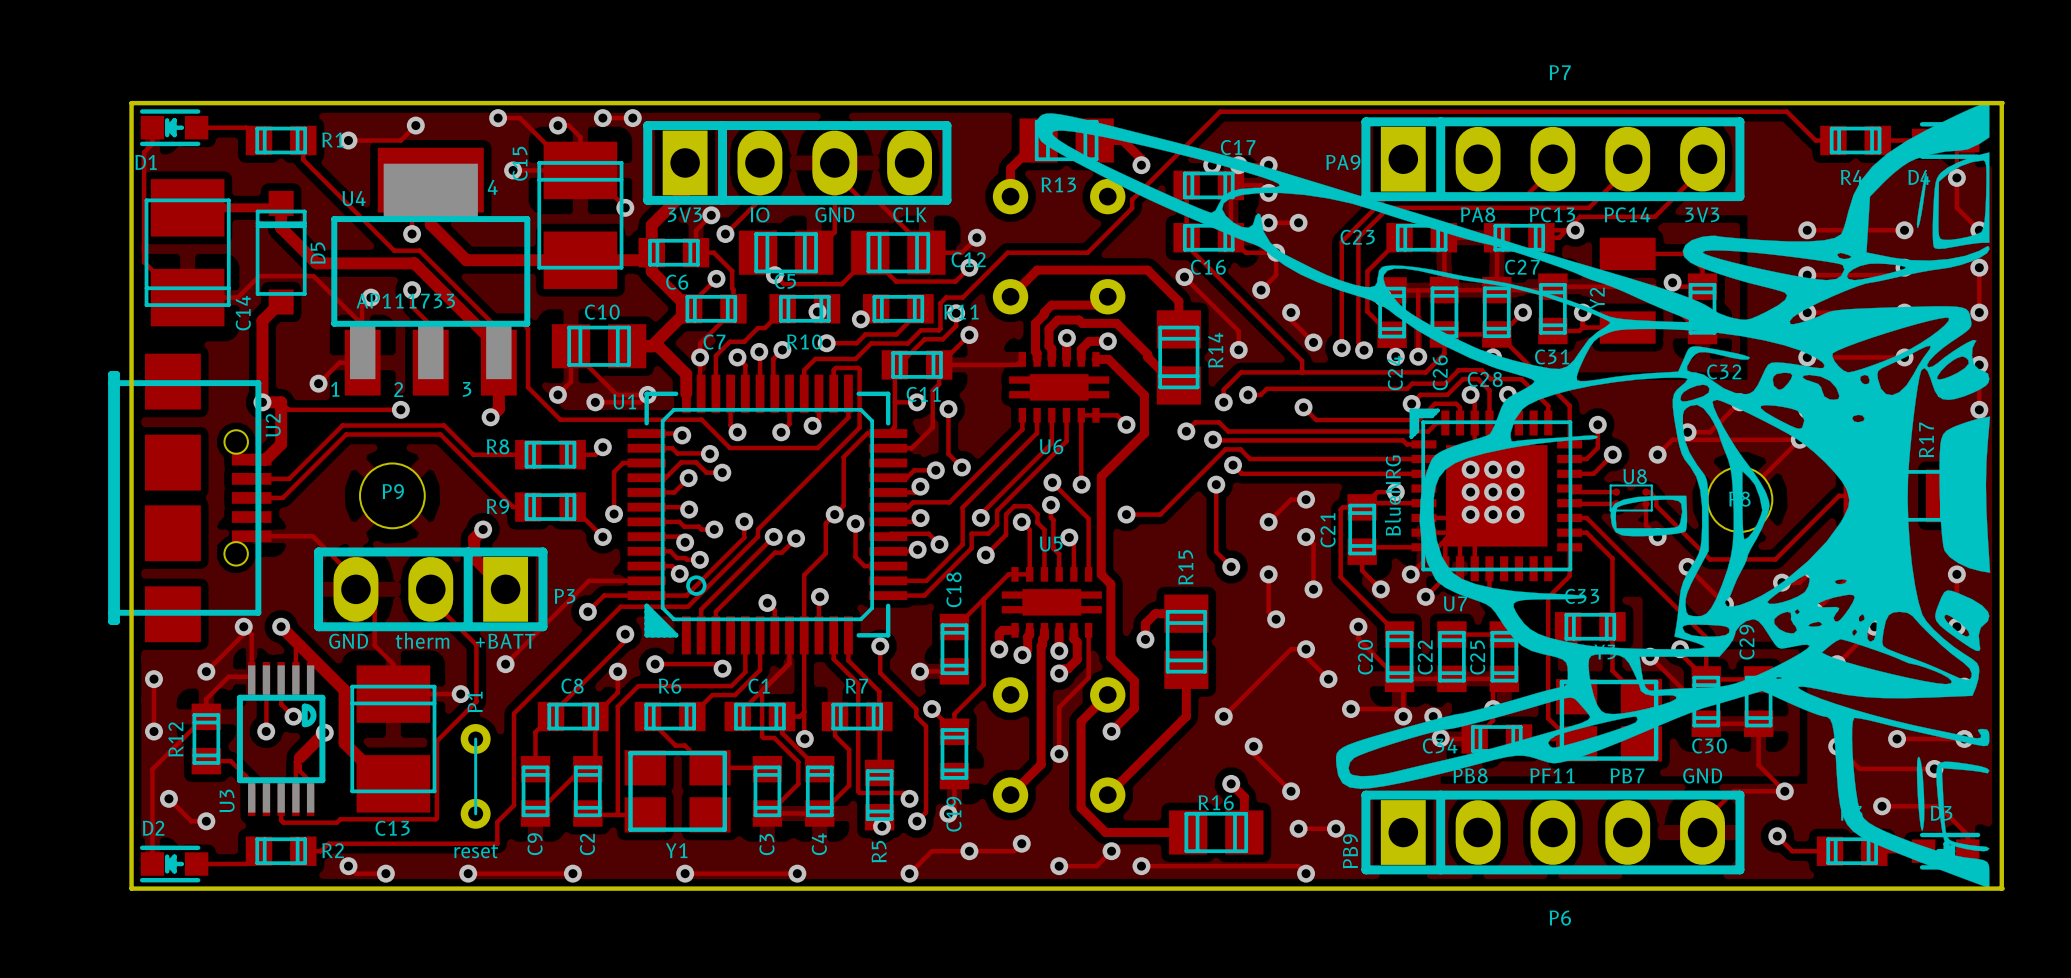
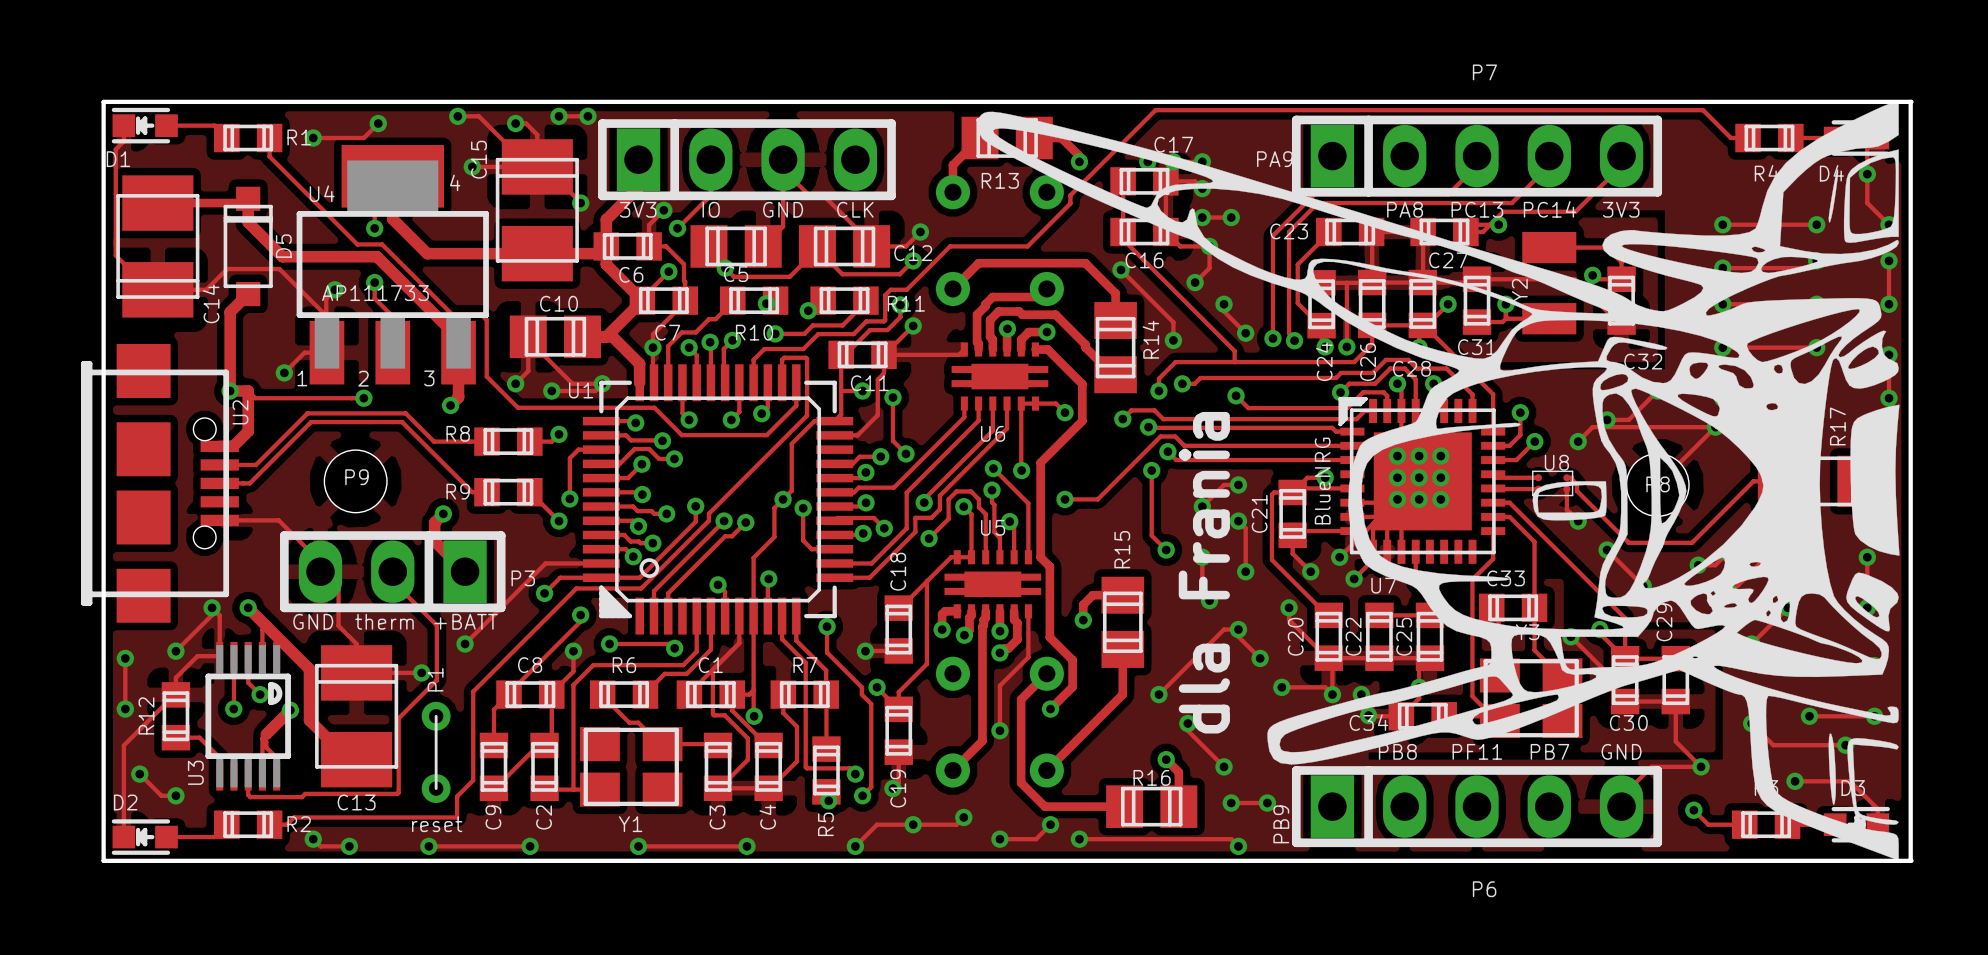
text: none -> dla Frania (1204, 572)

